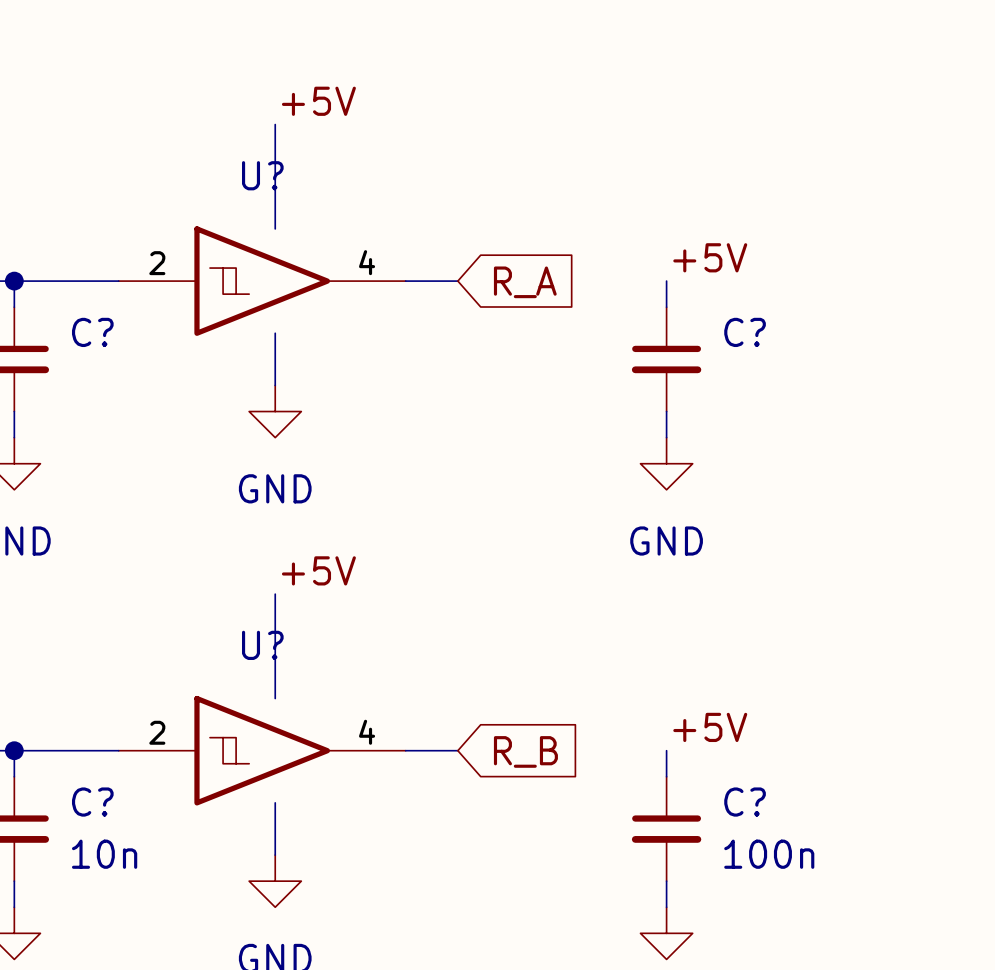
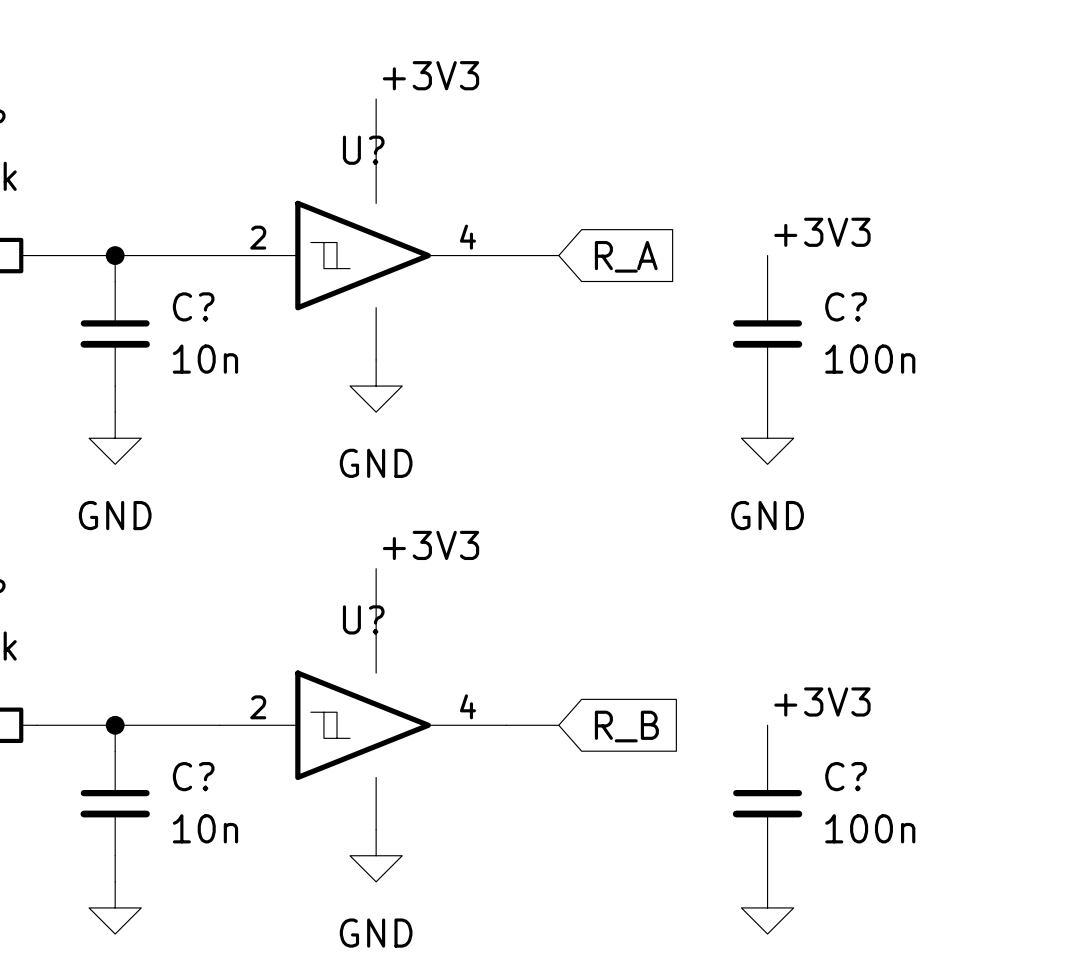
label: +5V (318, 101) -> +3V3 (431, 75)
label: +5V (710, 257) -> +3V3 (822, 232)
C? value: none -> 10n (205, 359)
C? value: none -> 100n (870, 359)
label: +5V (318, 570) -> +3V3 (431, 545)
label: +5V (710, 727) -> +3V3 (822, 701)

